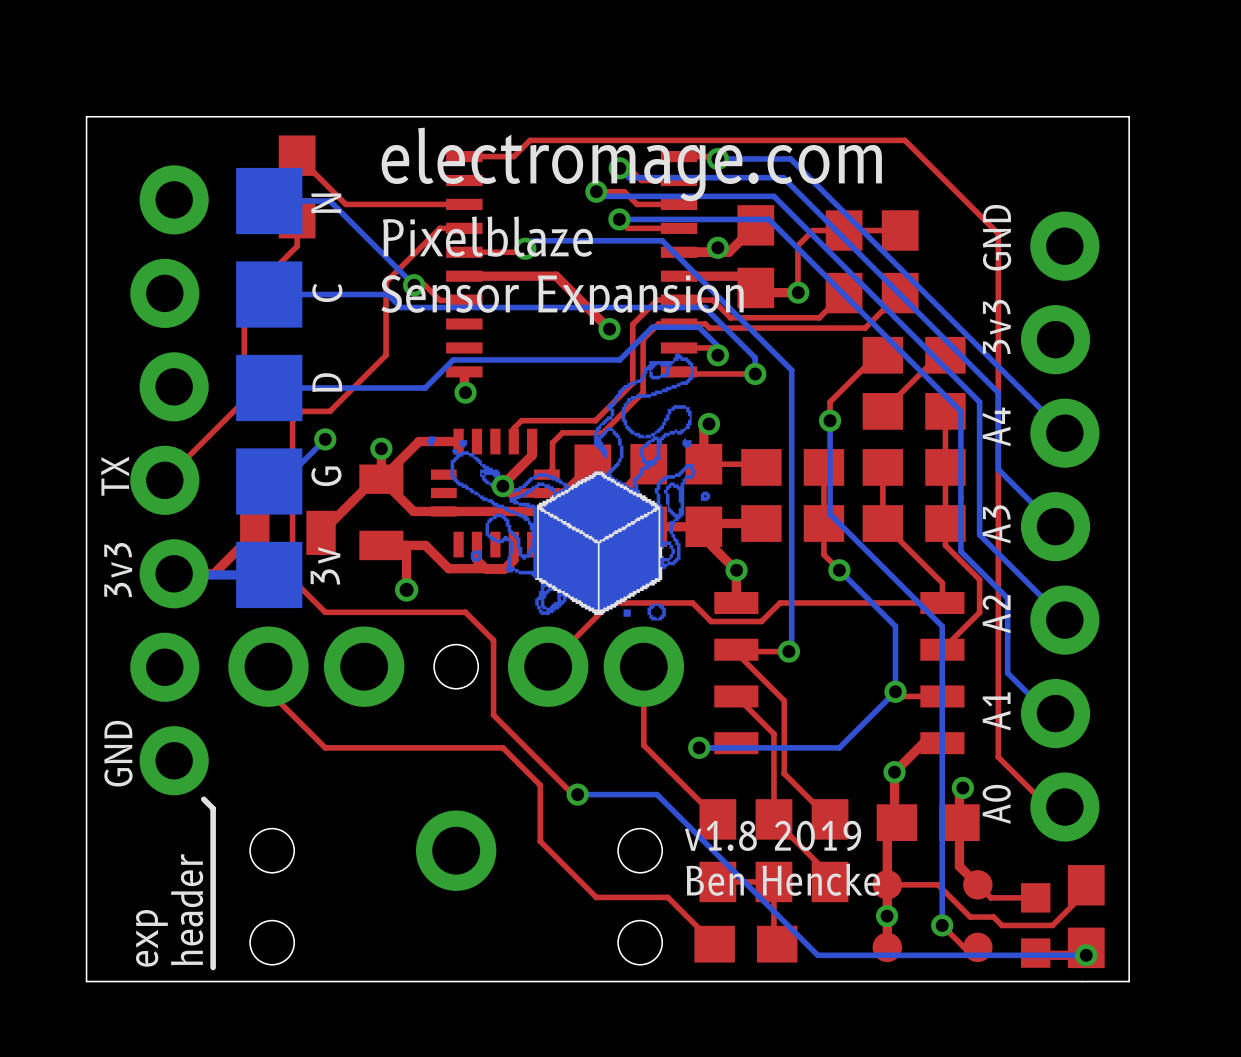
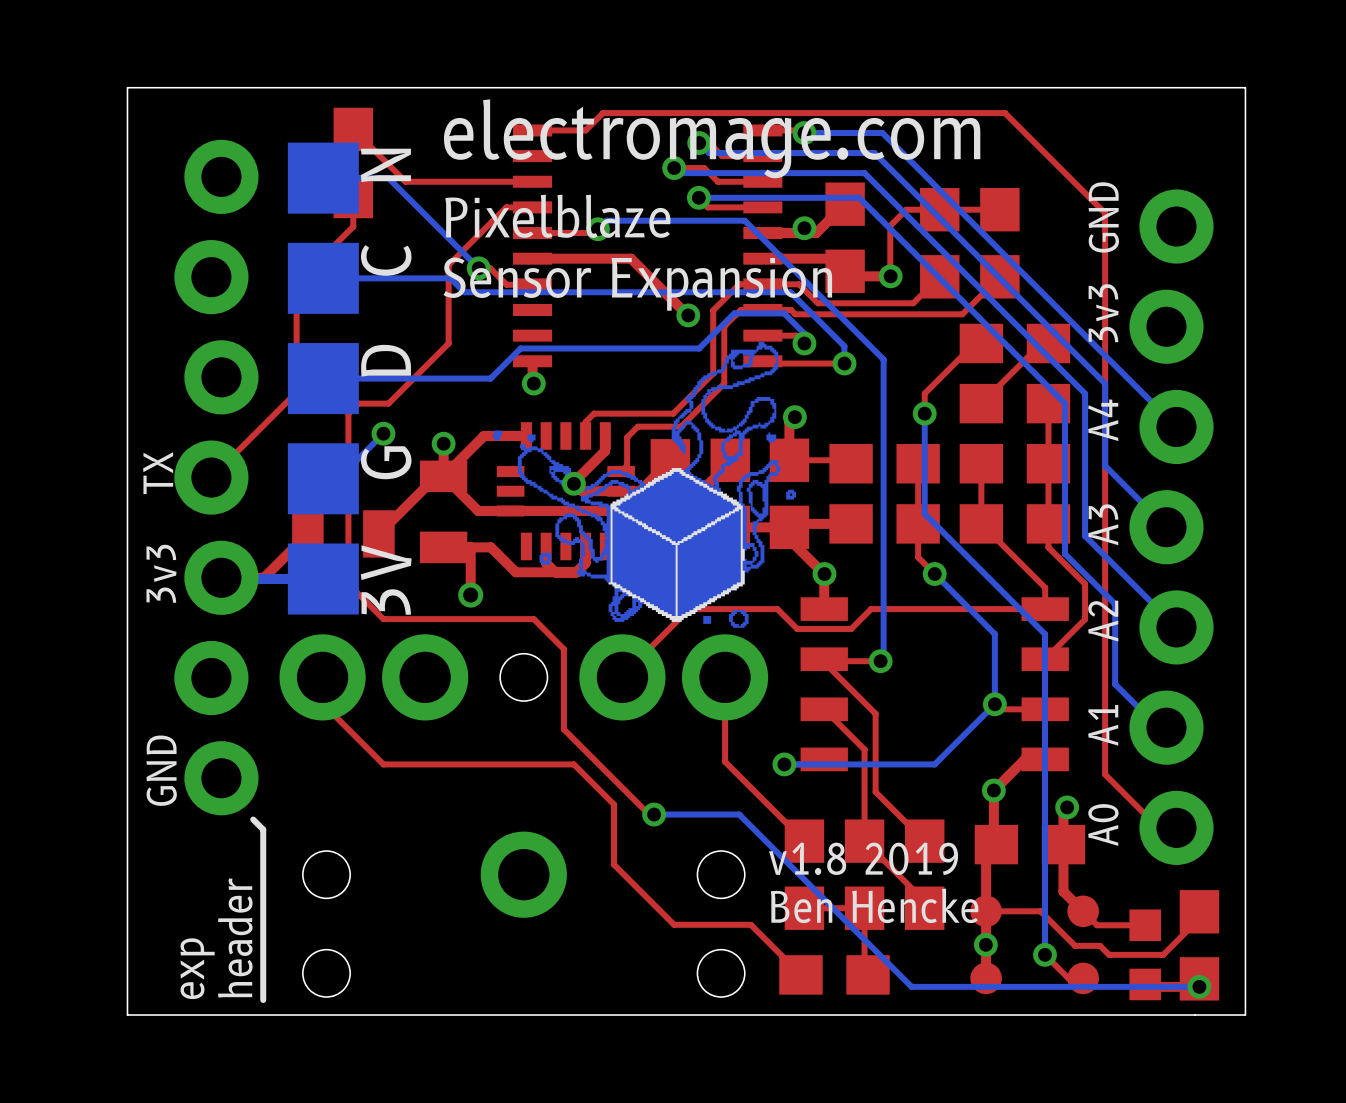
N name: none -> N (385, 165)
text: N (326, 203) -> none
C name: none -> C (386, 260)
text: C (327, 292) -> none
D name: none -> D (386, 360)
text: D (327, 382) -> none
G name: none -> G (386, 462)
text: G (326, 476) -> none
text: 3v (325, 565) -> none
3V name: none -> 3V (386, 580)

